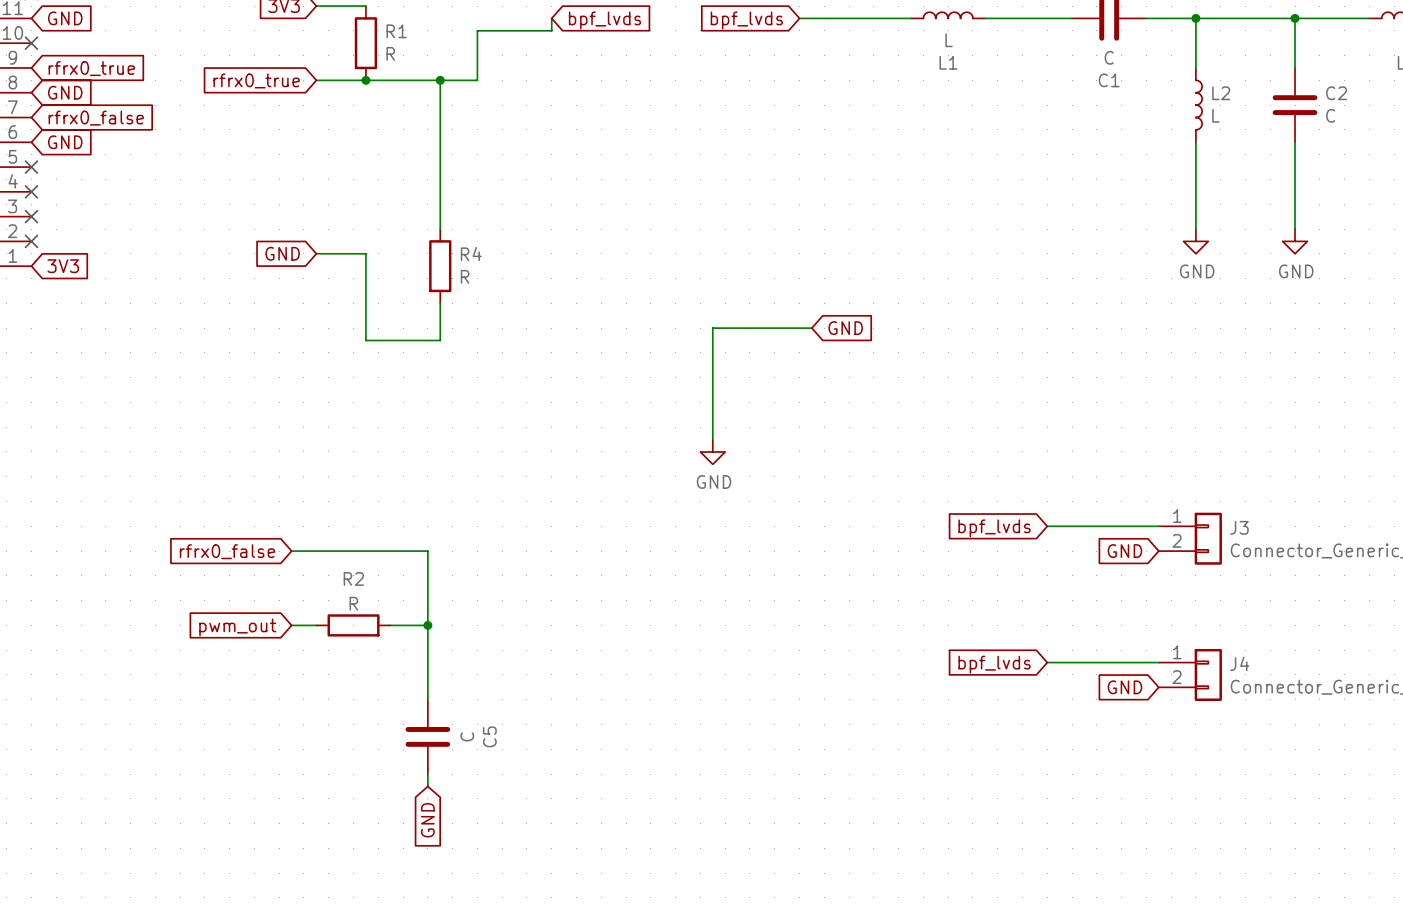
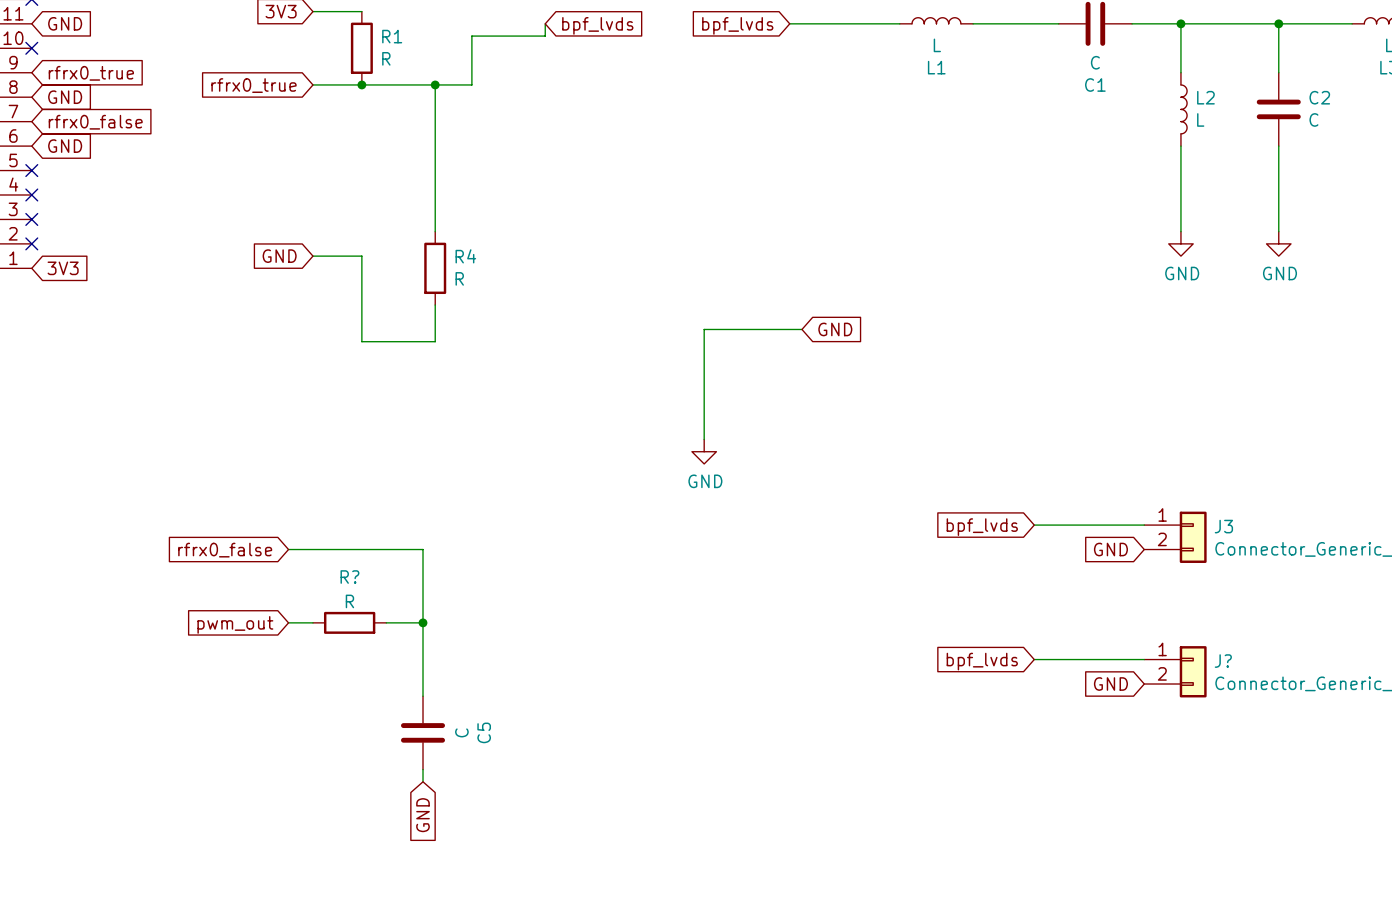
R2 name: R2 (353, 578) -> R? (349, 577)
J4 name: J4 (1239, 663) -> J? (1223, 661)

